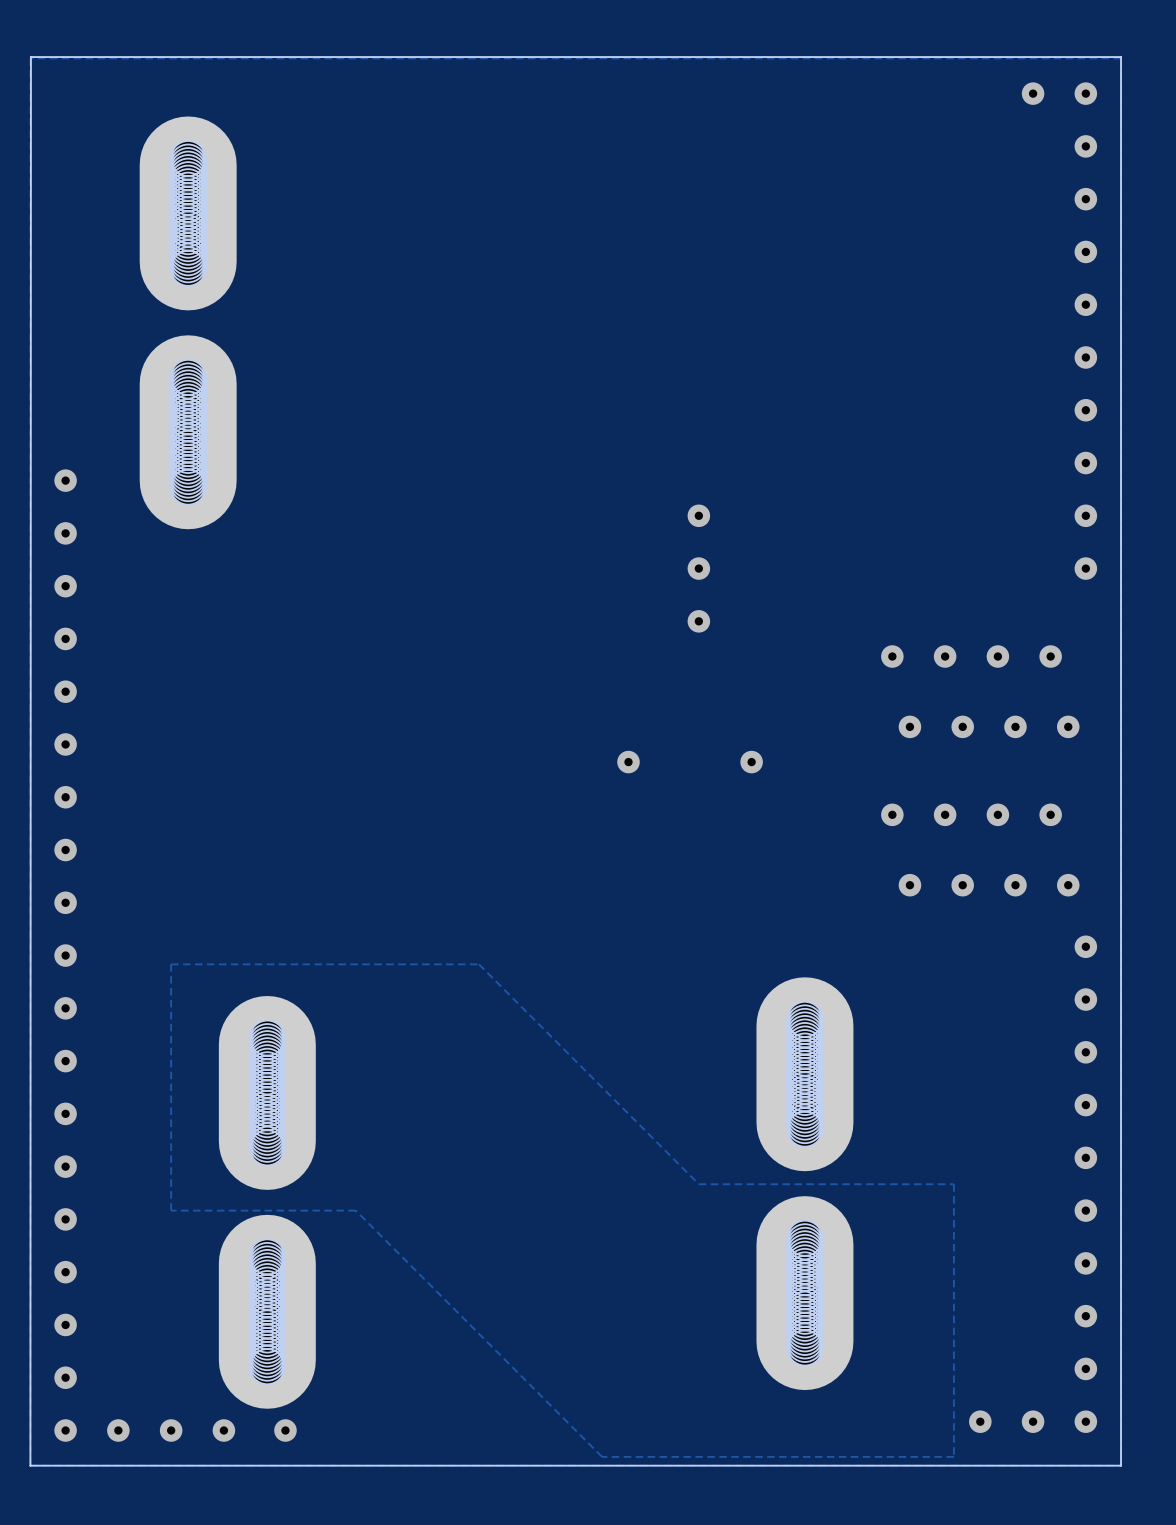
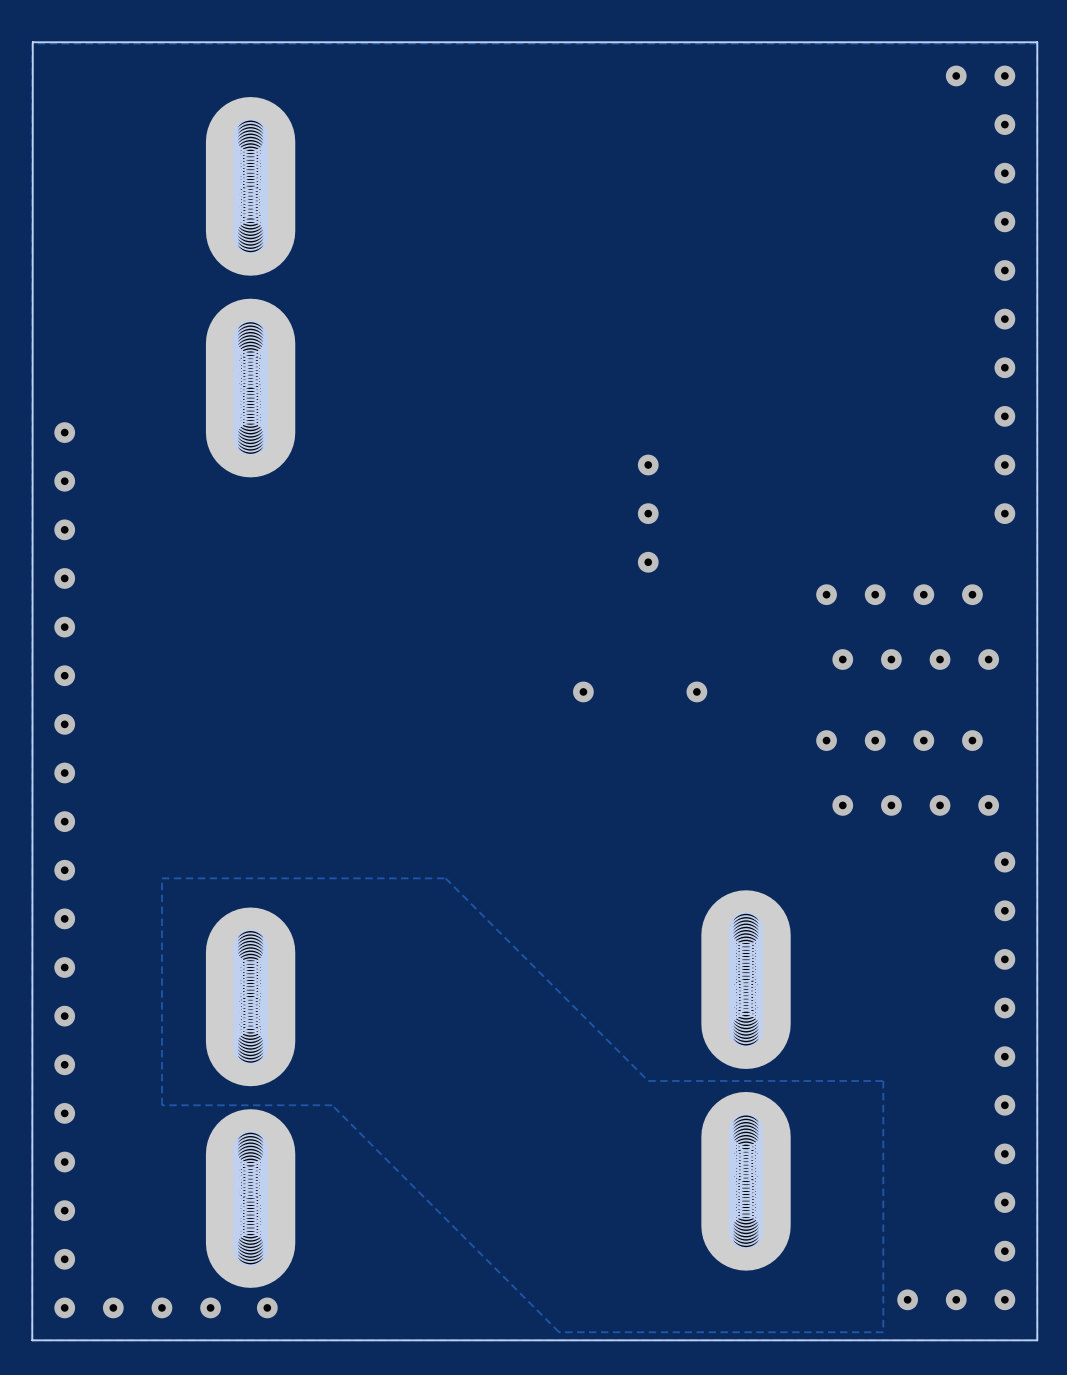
part position: (188, 322) -> (250, 287)

